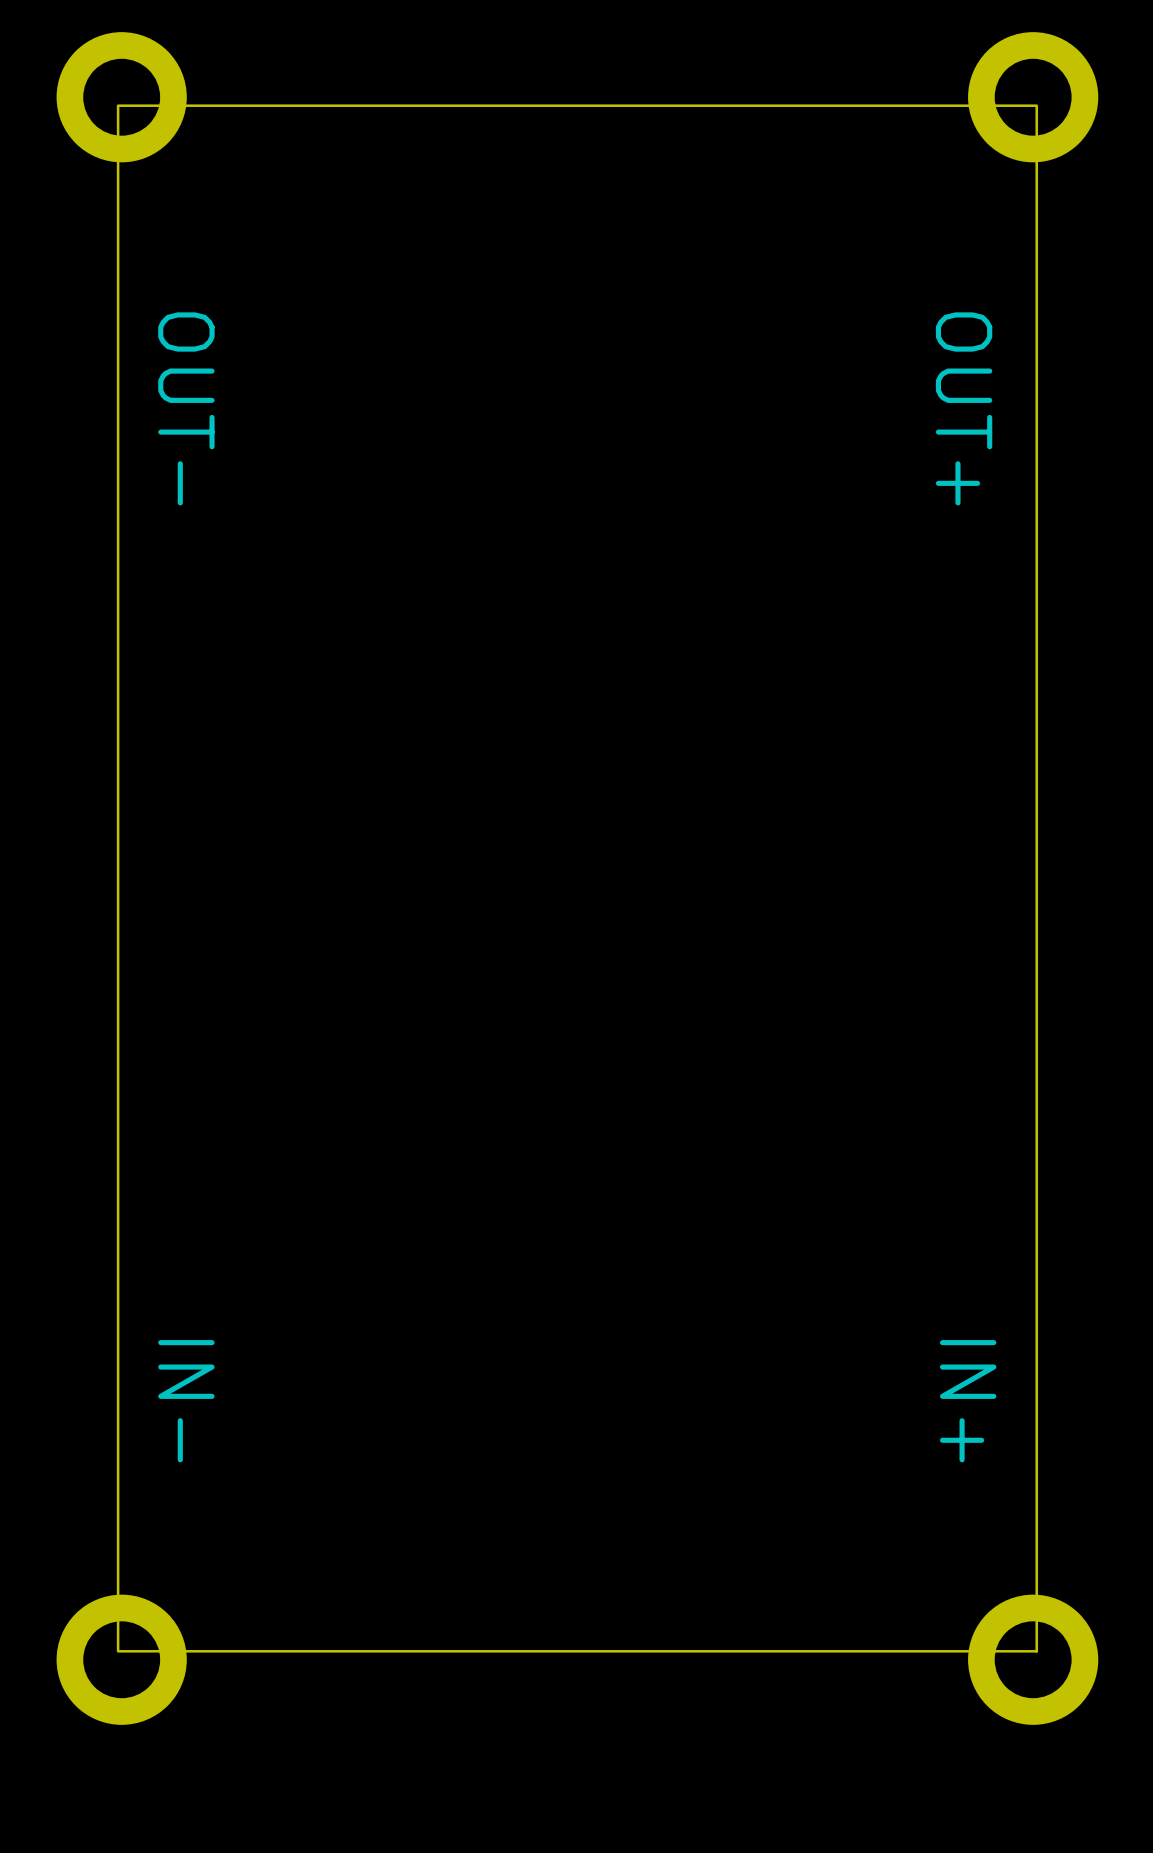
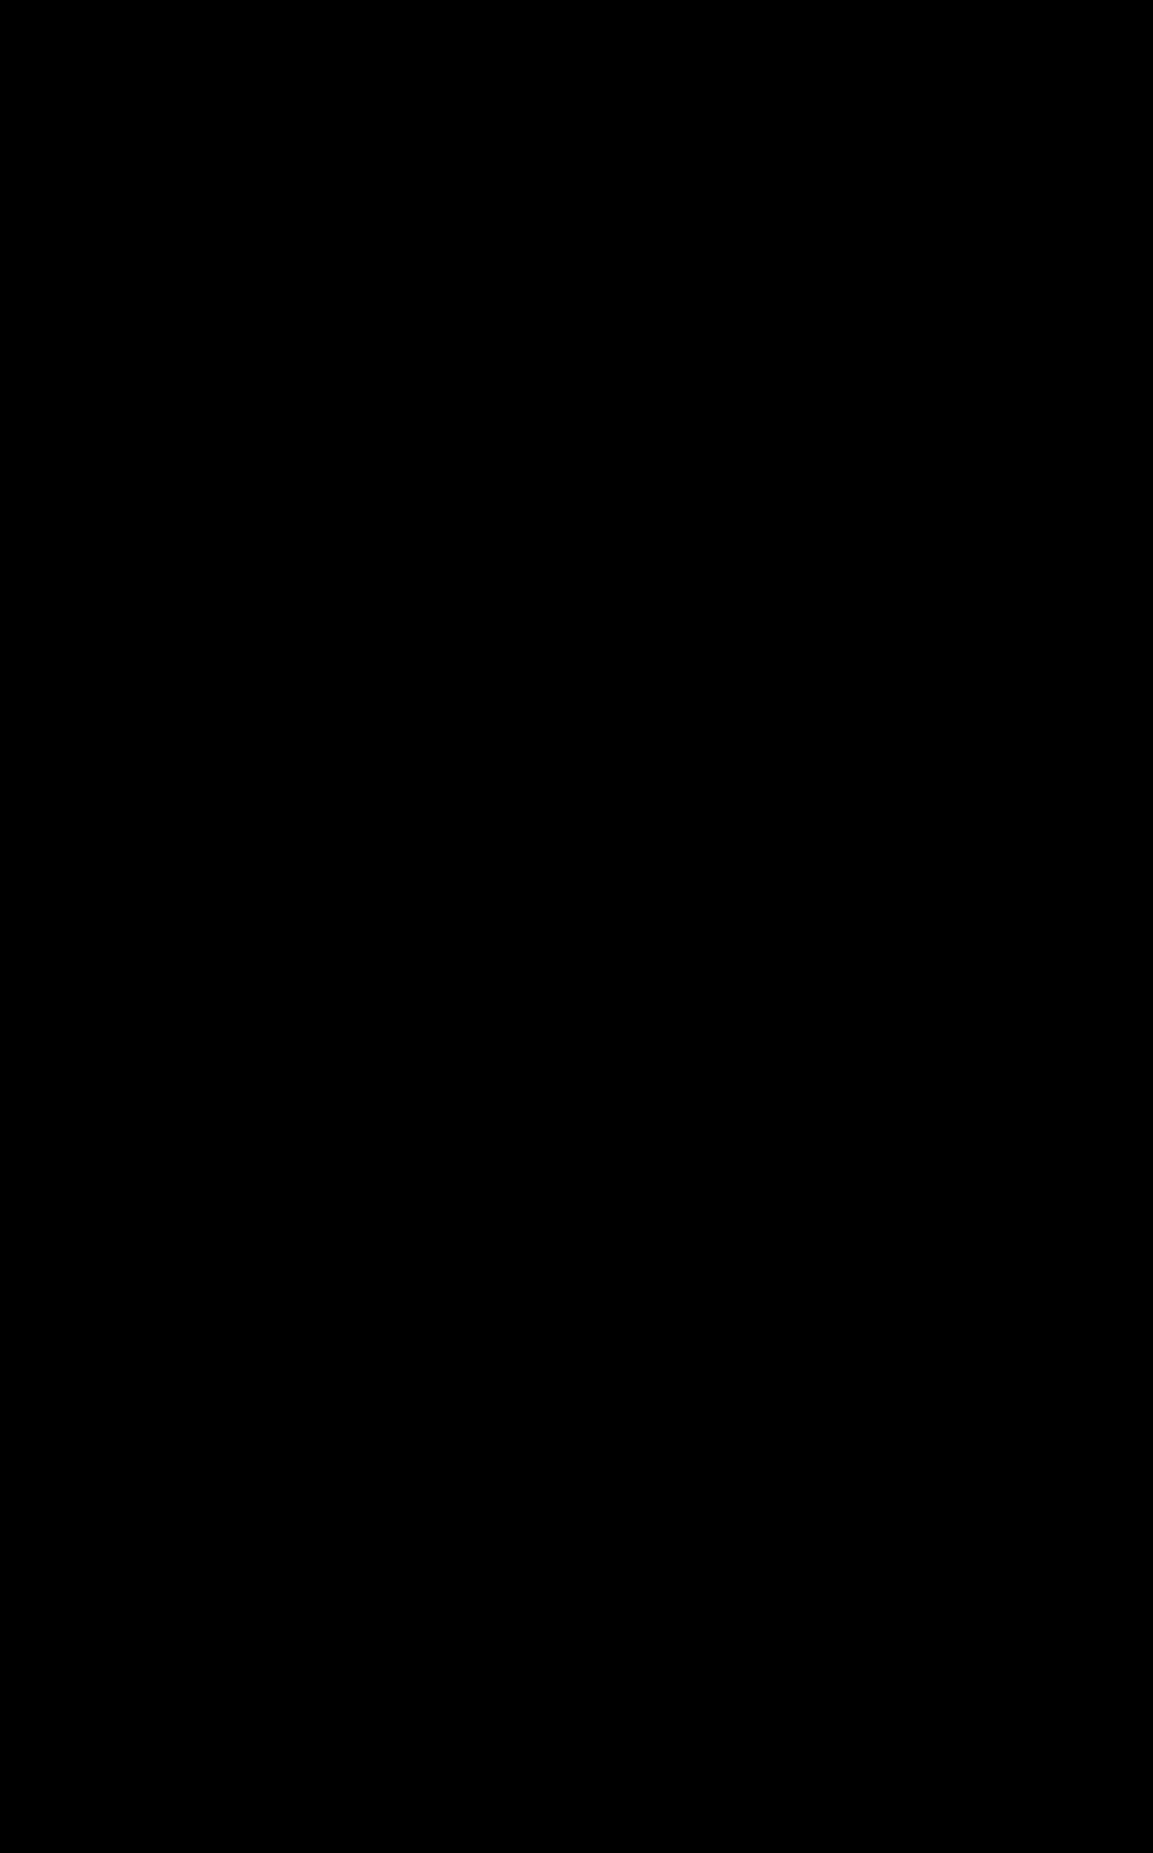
part: (577, 878) -> none

